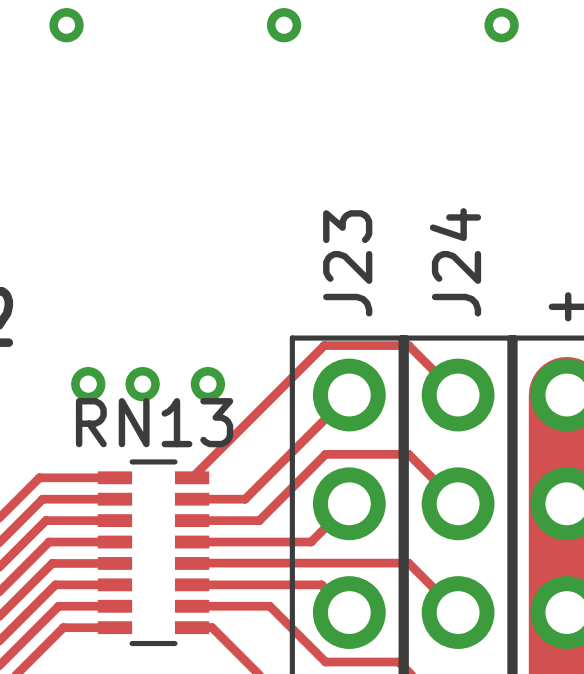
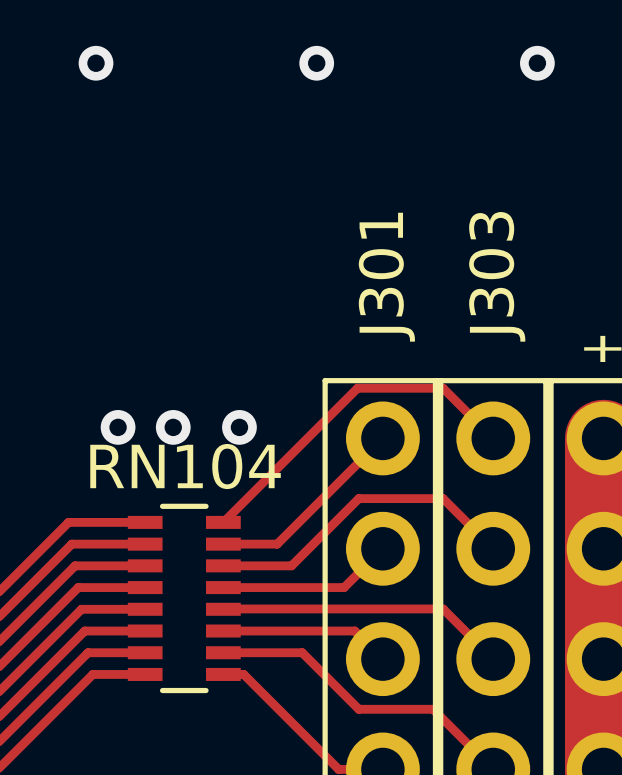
J24 name: J24 (455, 262) -> J303 (497, 276)
J23 name: J23 (347, 263) -> J301 (386, 277)
RN13 name: RN13 (154, 422) -> RN104 (185, 466)

